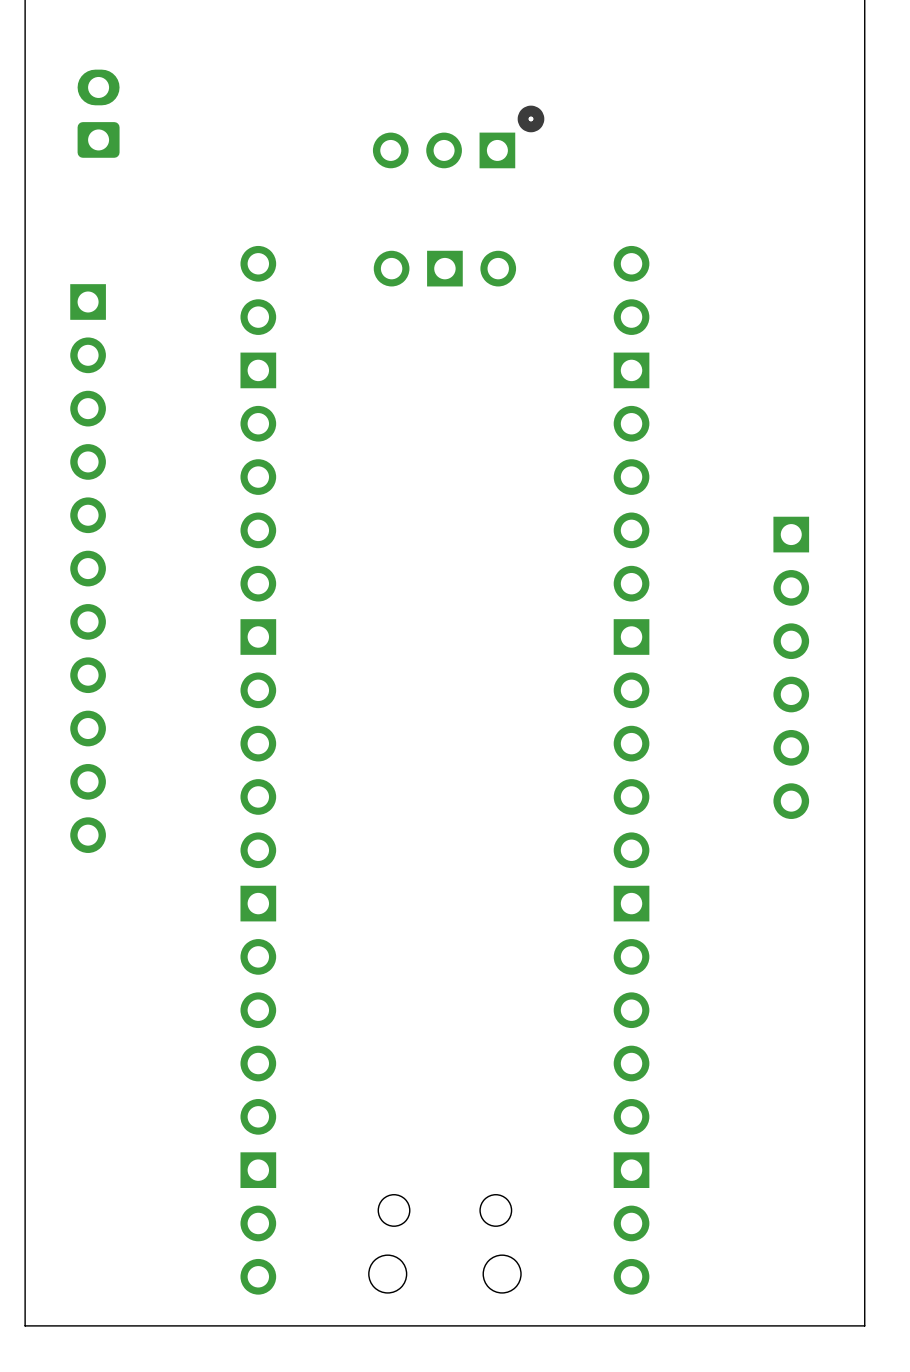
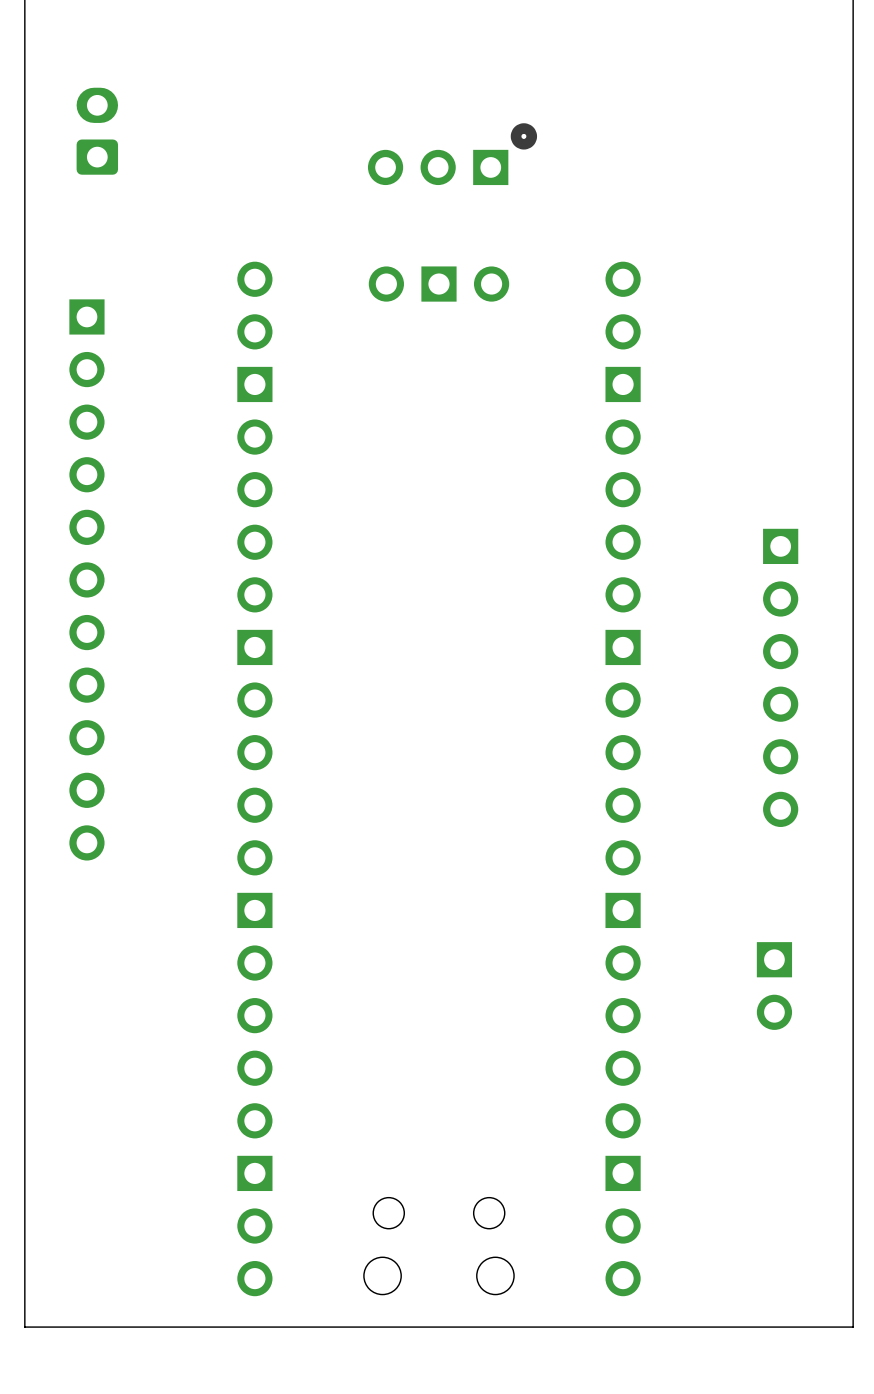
part: none -> (774, 986)

